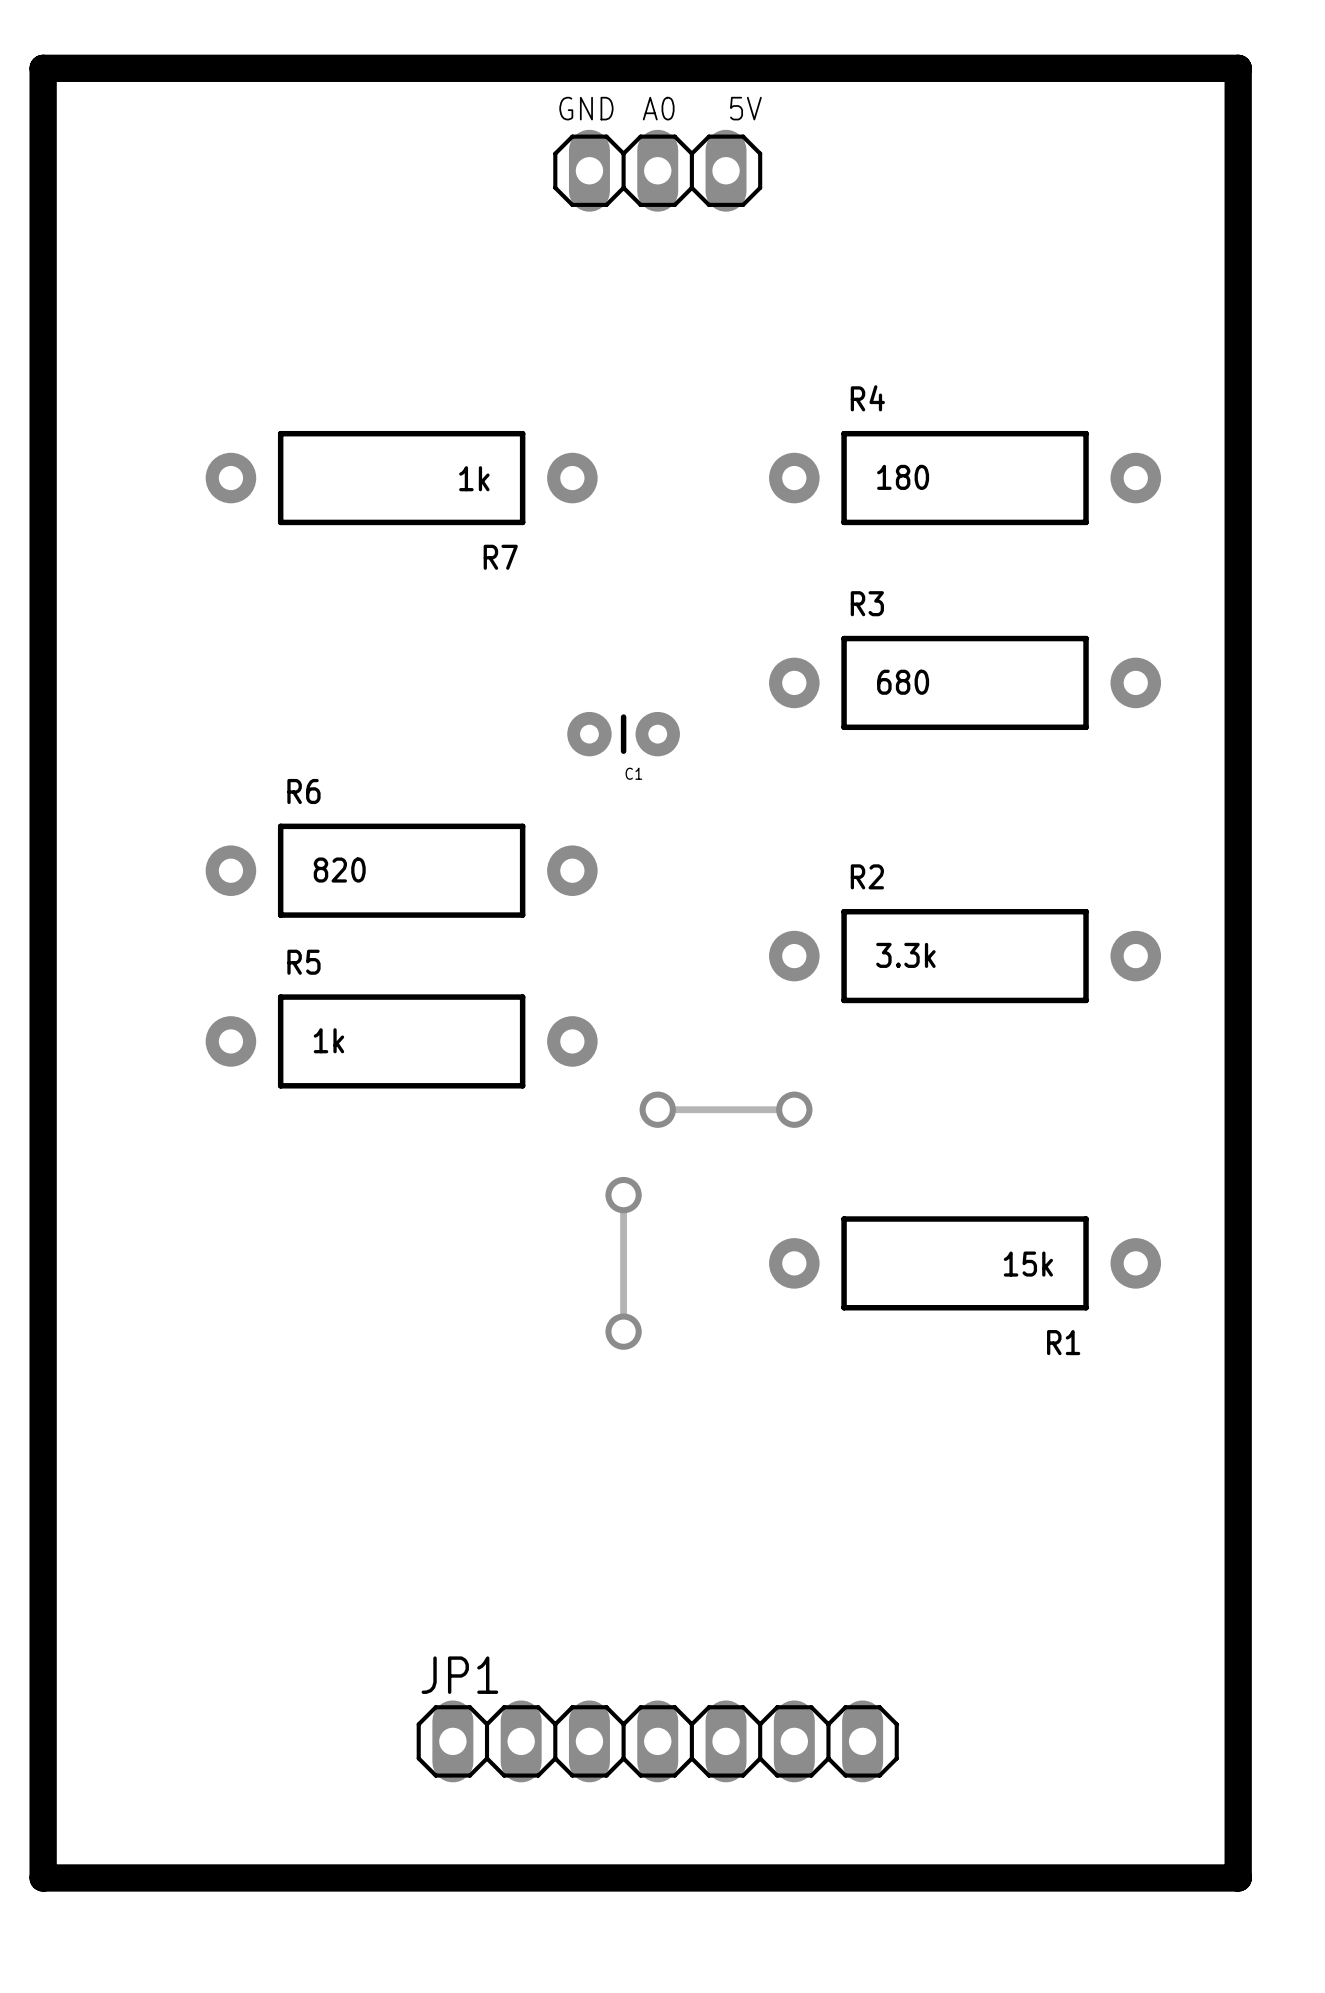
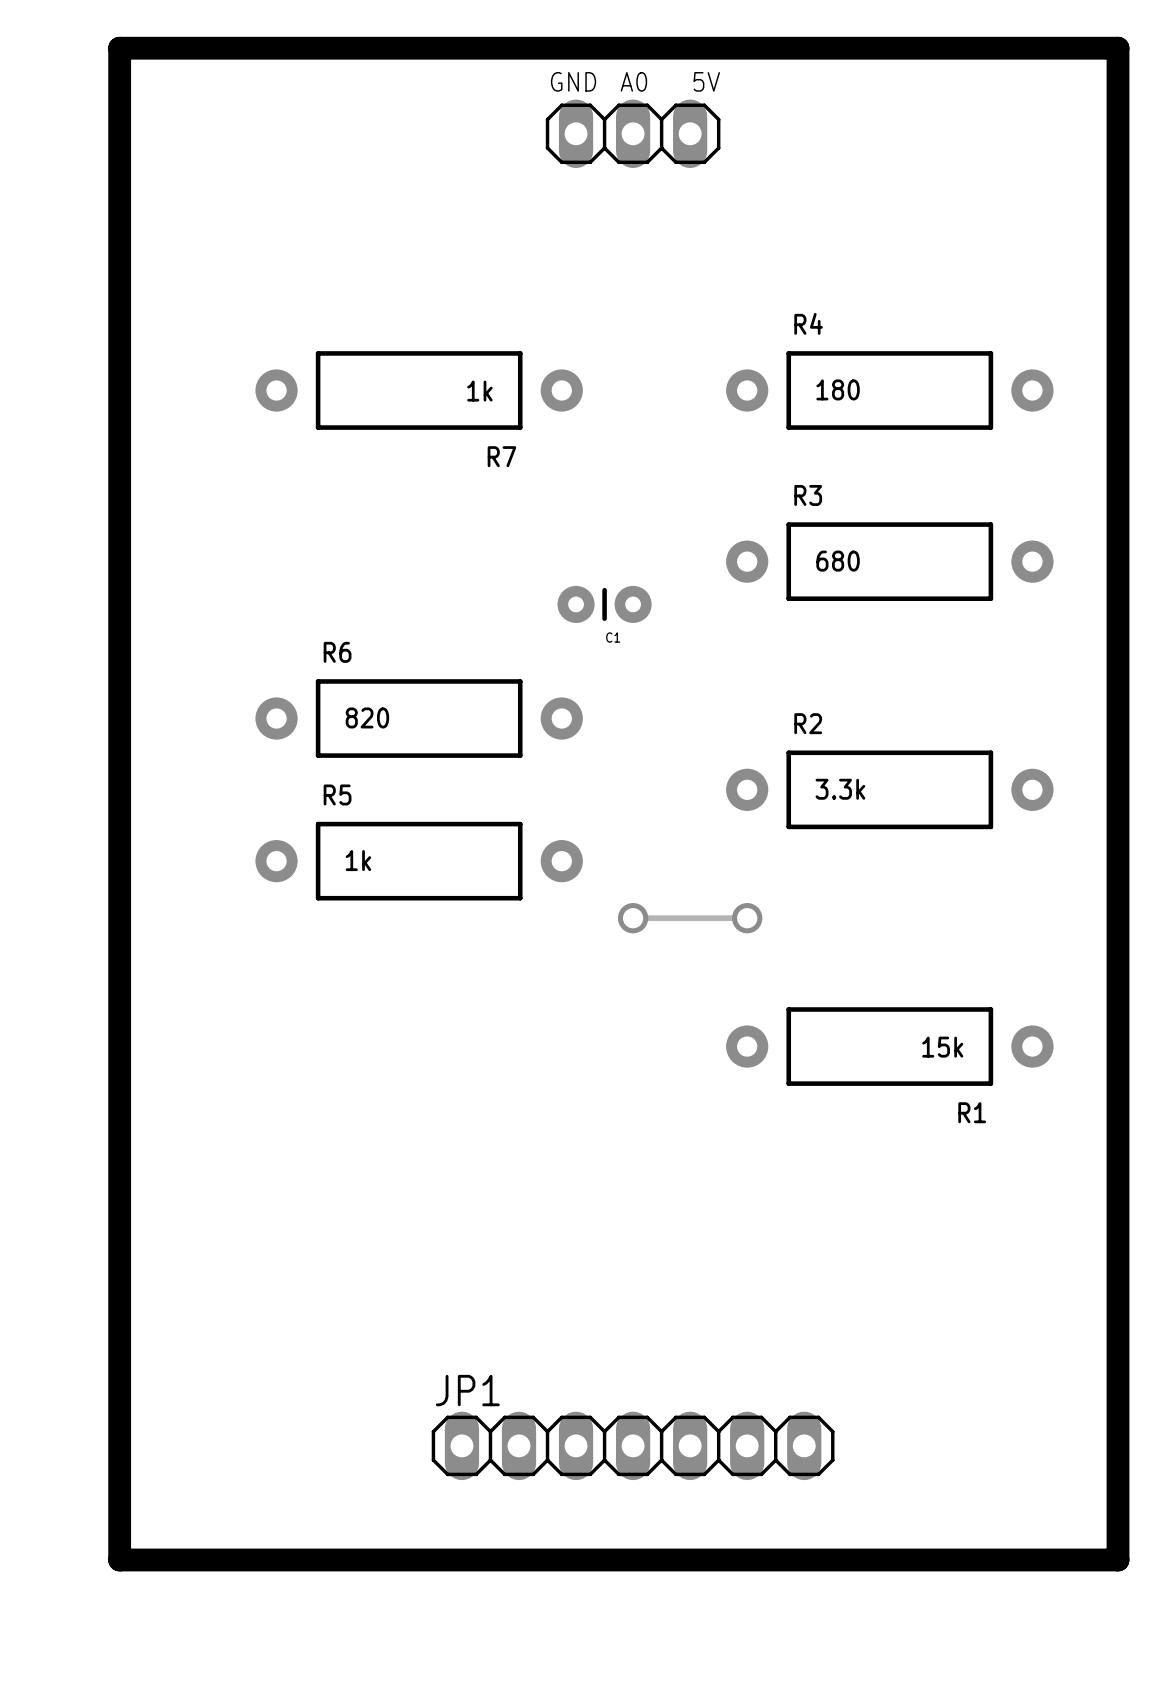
track: (623, 1195) (623, 1331) -> none
via: (623, 1195) -> none
via: (623, 1331) -> none

